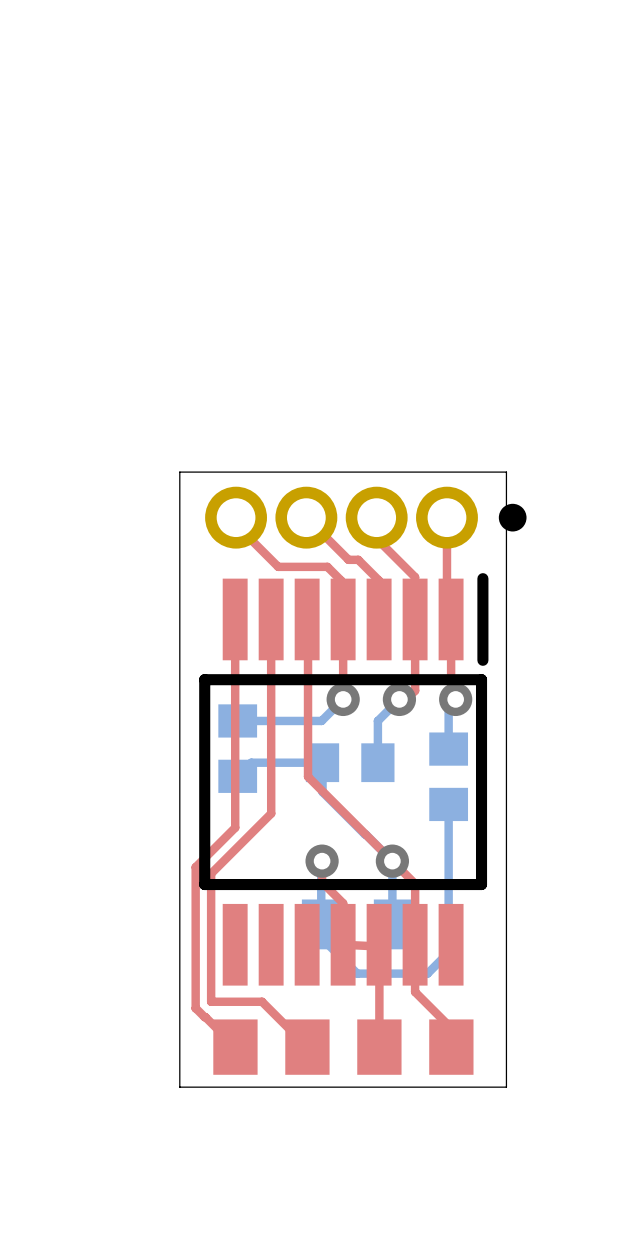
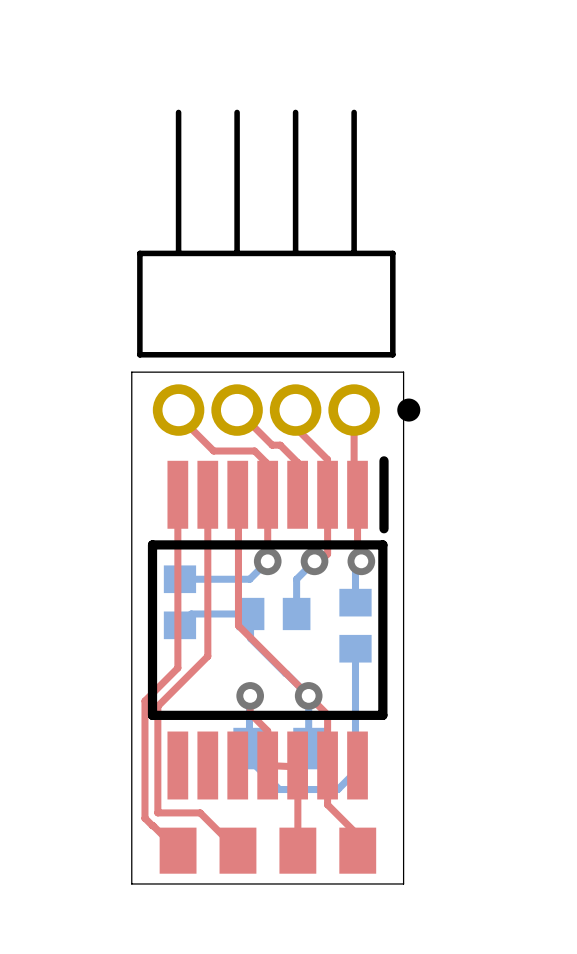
part: none -> (278, 272)

